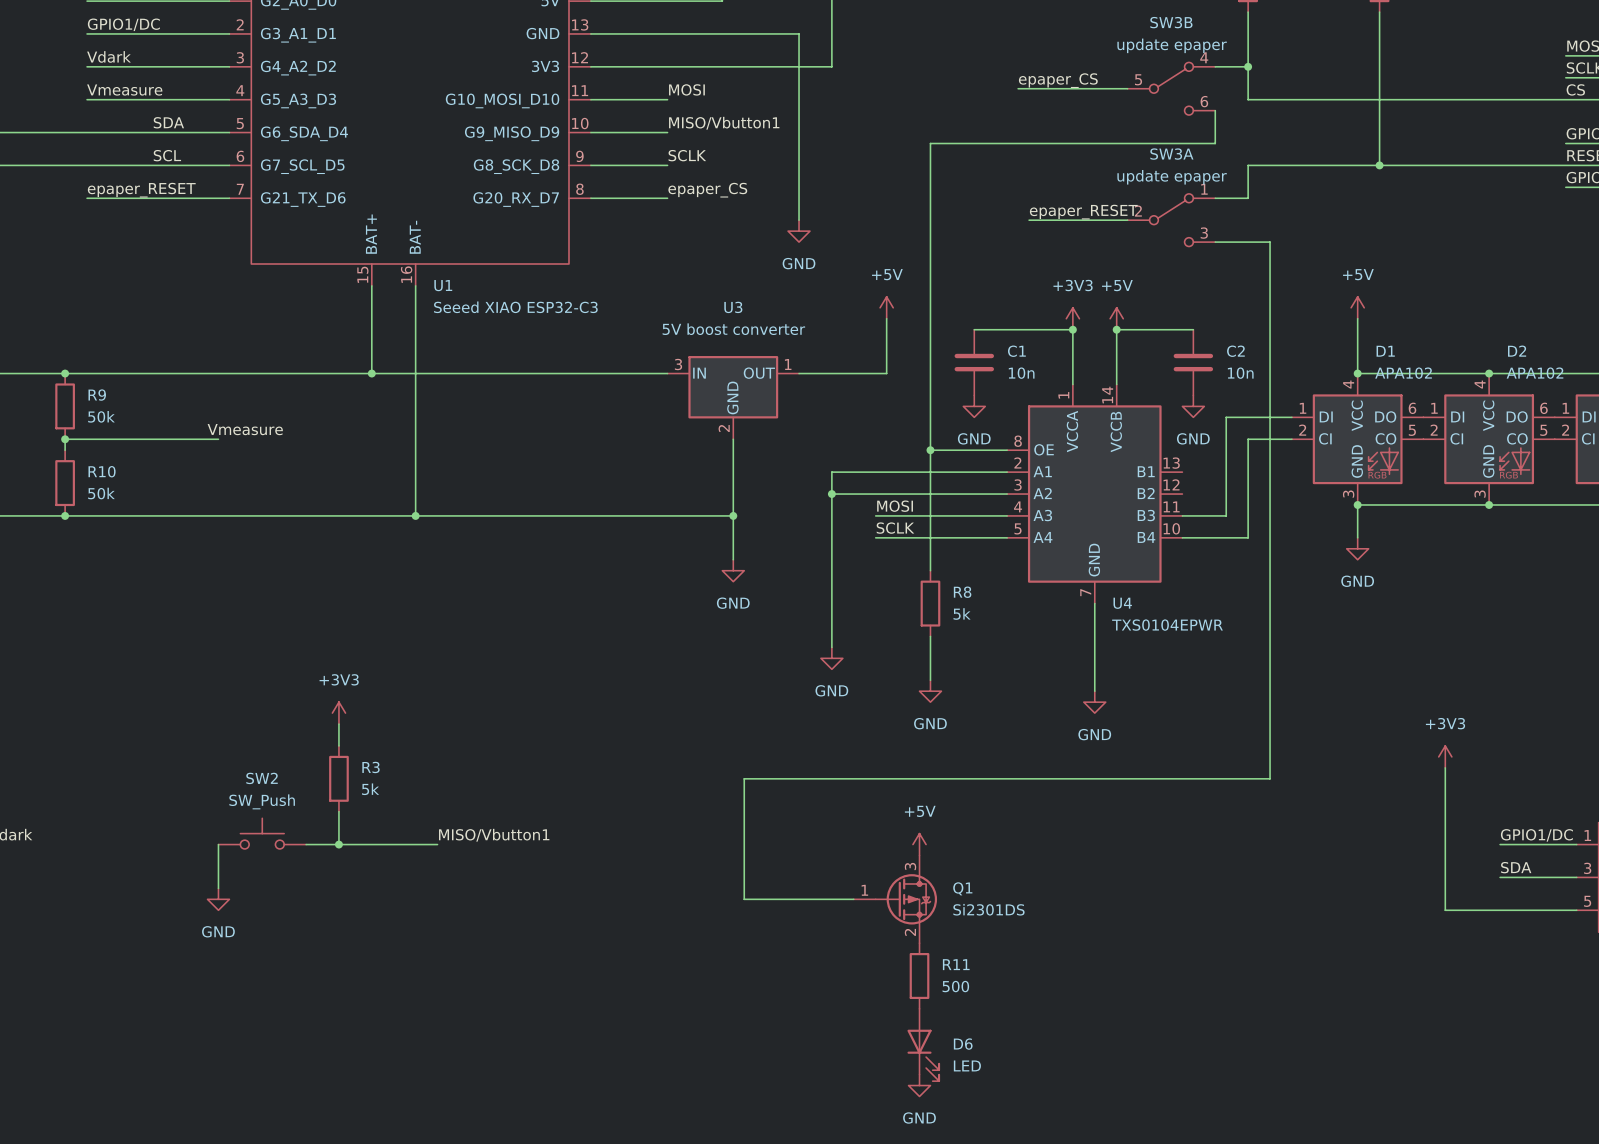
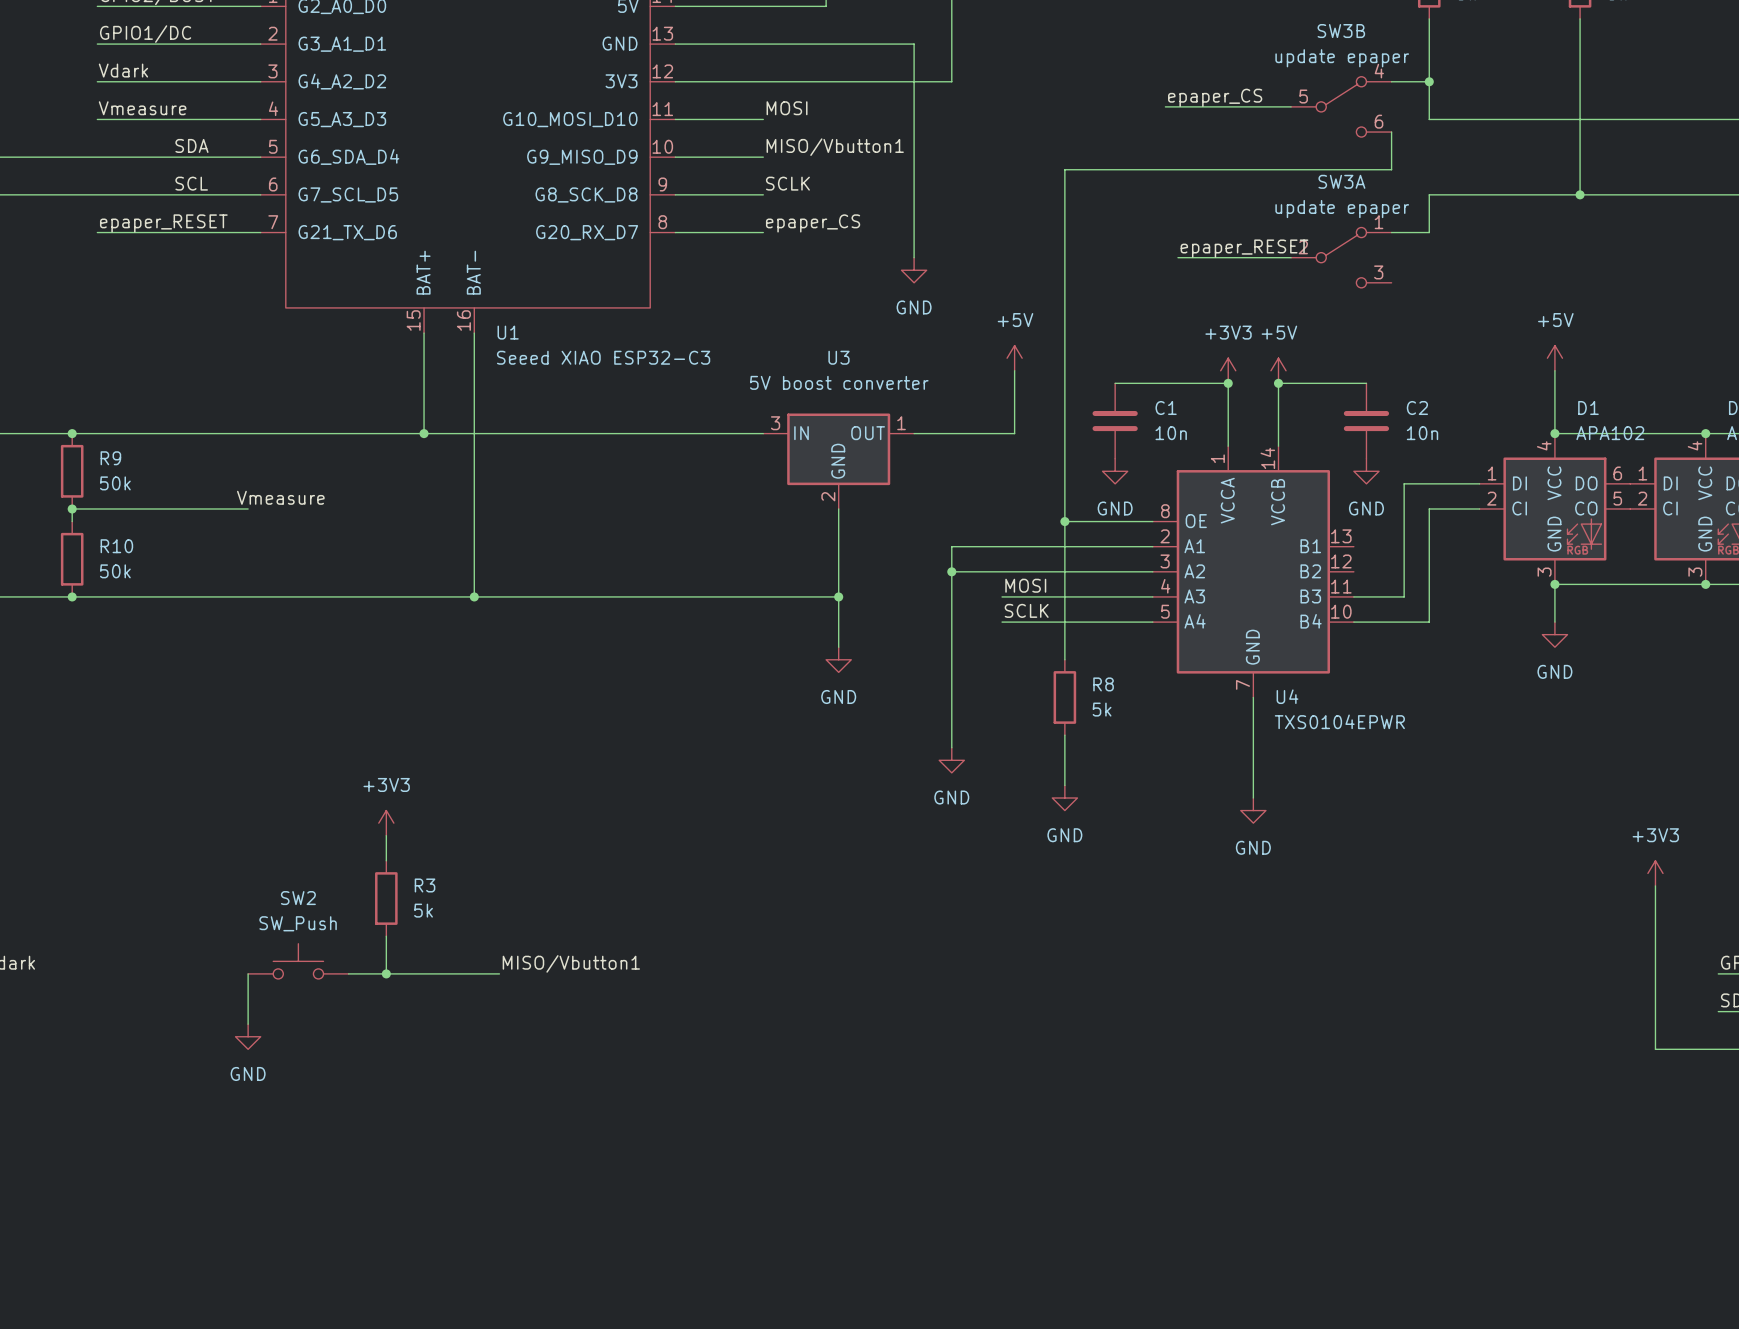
wire: (1215, 242) (1270, 242) (1270, 778) (744, 778) (744, 899) (853, 899) -> none
power symbol: +5V (919, 844) -> none
Q1: Si2301DS (895, 899) -> none
R11: 500 (919, 976) -> none
D6: LED (923, 1045) -> none
power symbol: GND (919, 1085) -> none

